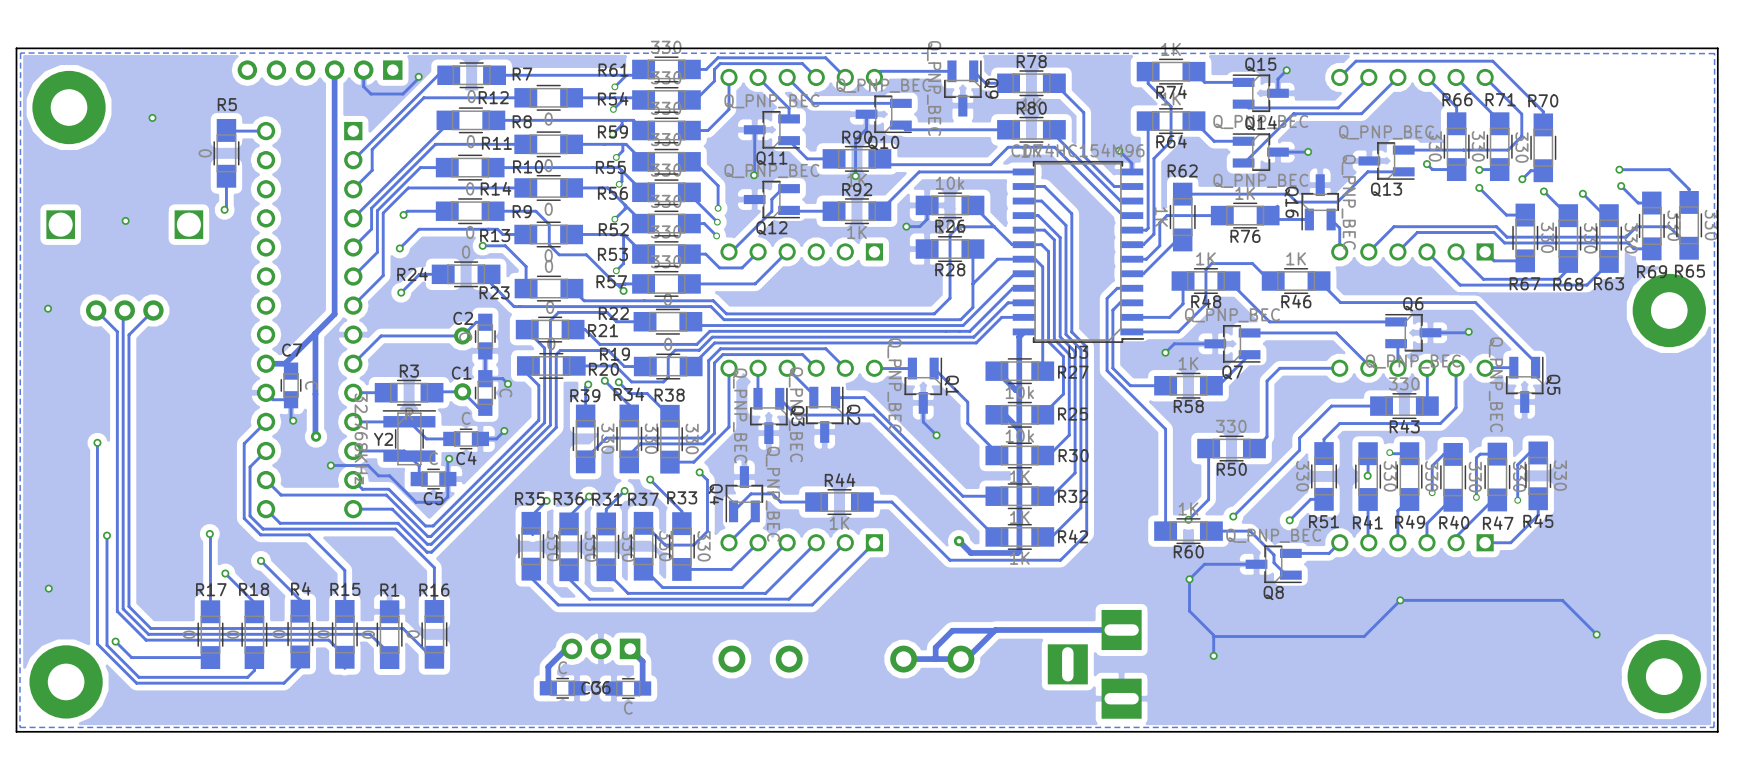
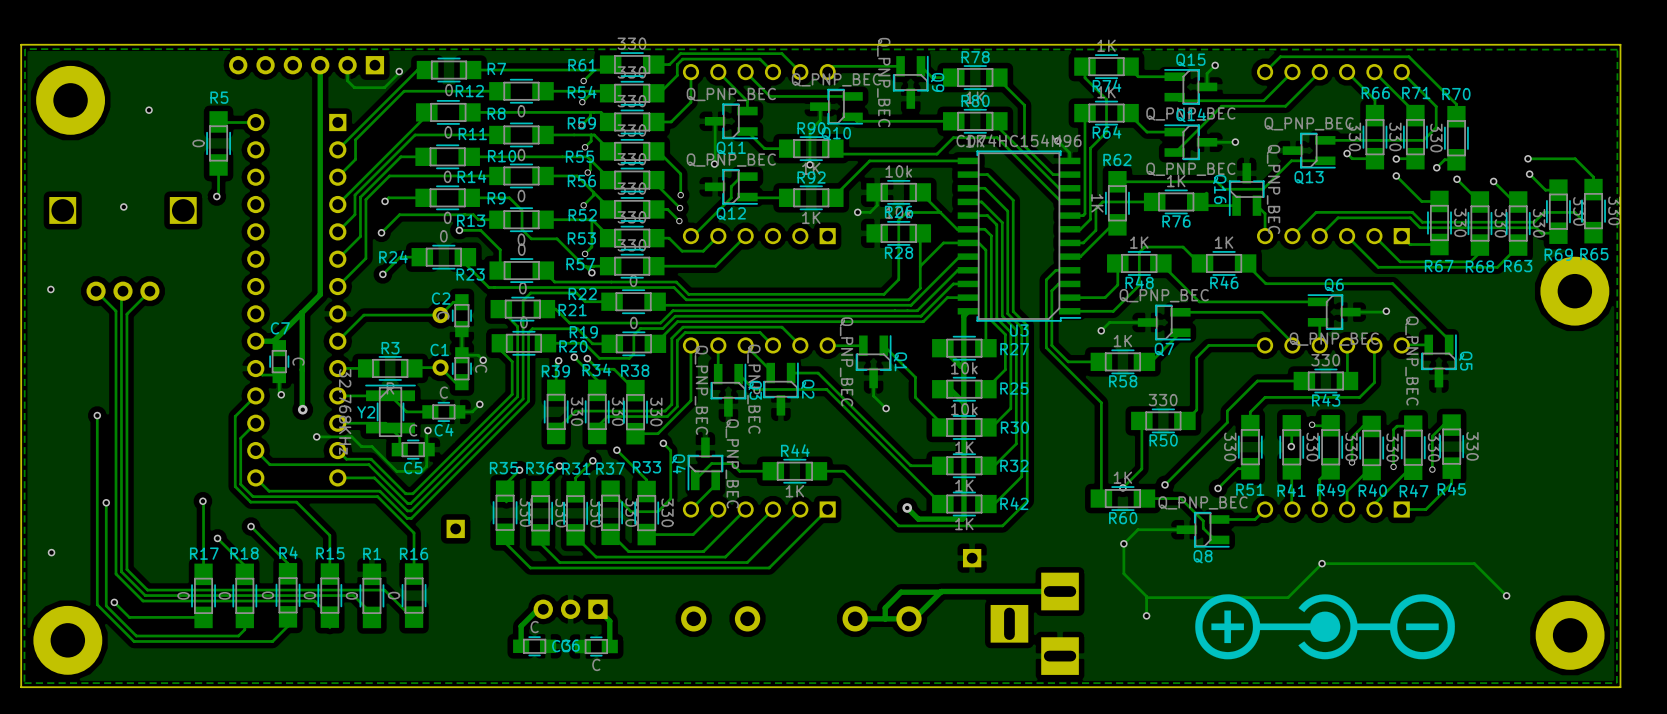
part: none -> (455, 528)
part: none -> (972, 558)
drawing: none -> [1195, 594, 1455, 660]

